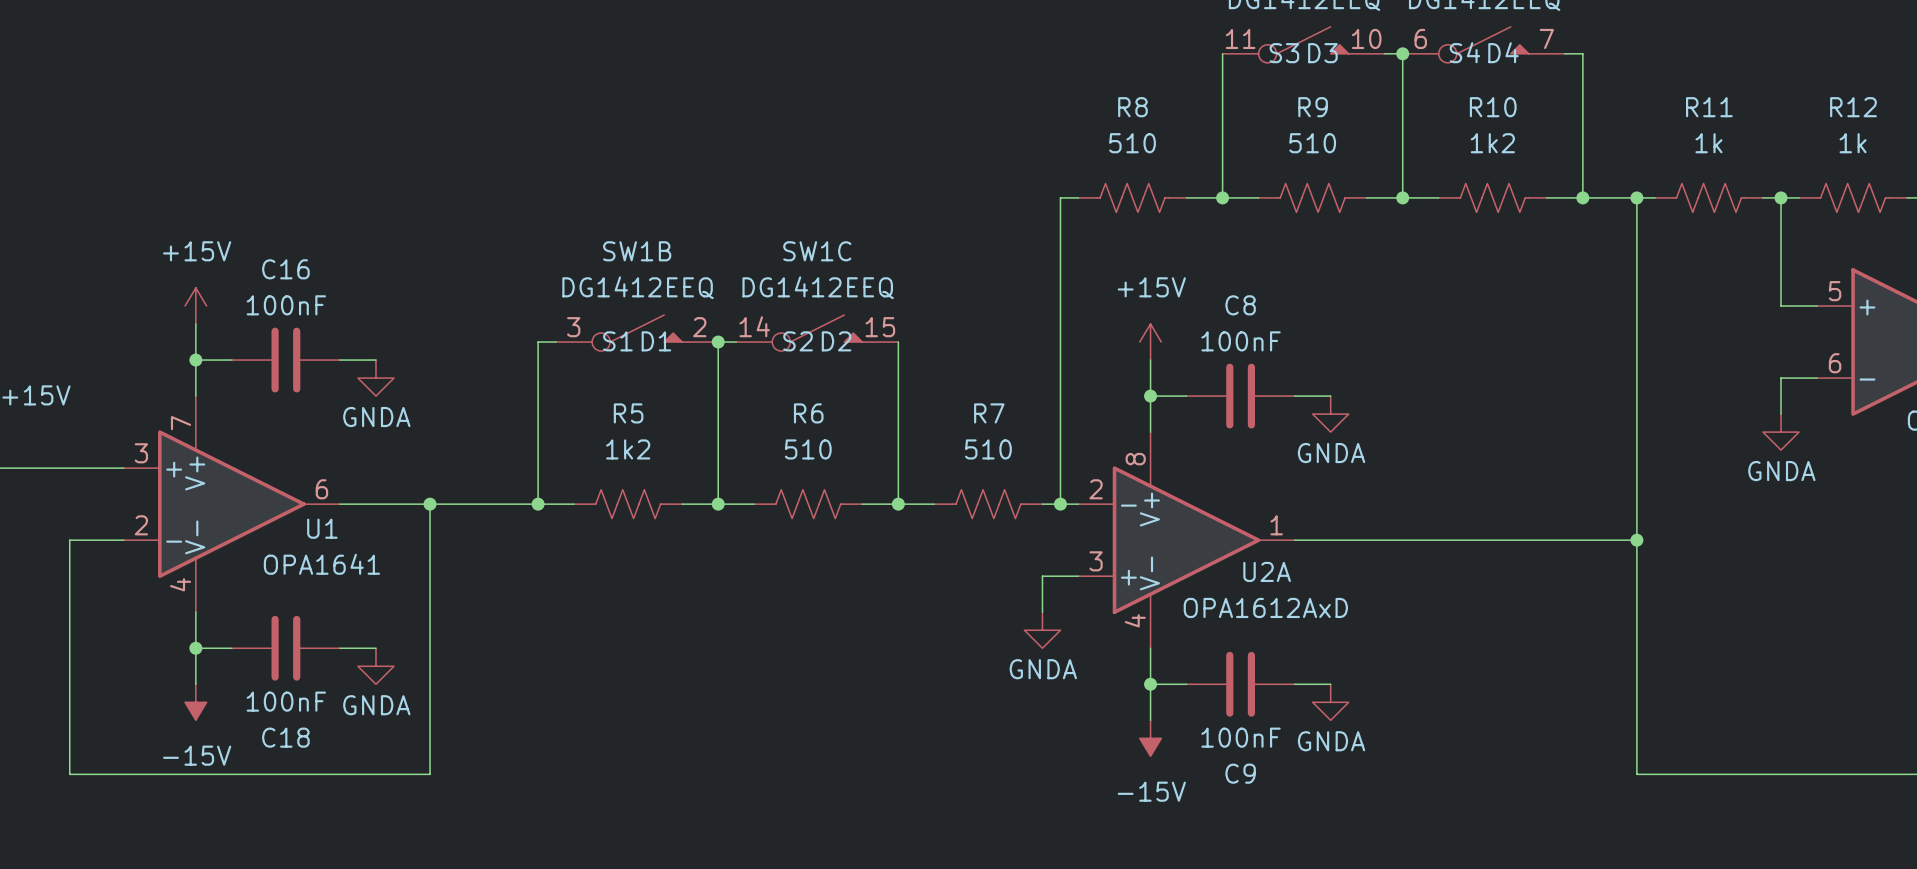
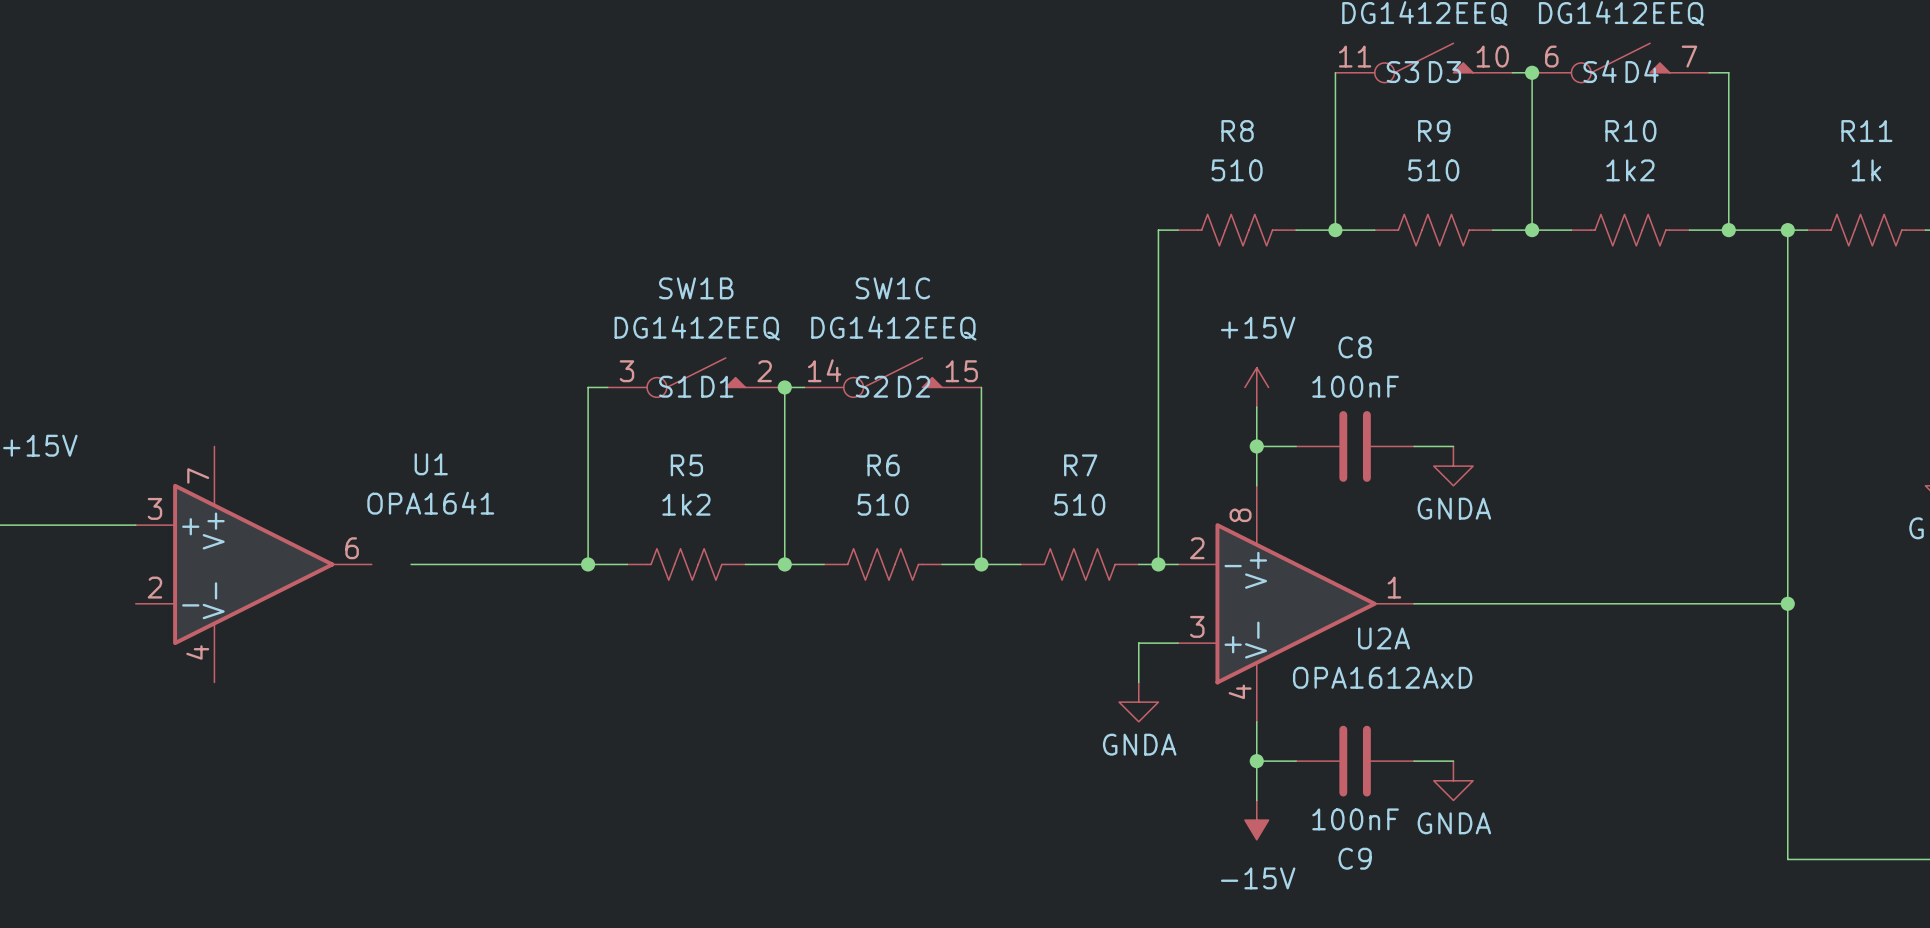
power symbol: +15V (195, 306) -> none
wire: (195, 324) (195, 396) -> none
wire: (195, 360) (231, 360) -> none
junction: (195, 360) -> none
C16: 100nF (285, 360) -> none
wire: (339, 360) (375, 360) -> none
power symbol: GNDA (375, 378) -> none
wire: (339, 504) (375, 504) -> none
wire: (430, 504) (430, 774) (69, 774) (69, 540) (123, 540) -> none
junction: (430, 504) -> none
U1 name position: U1 (322, 528) -> U1 (431, 464)
U1 value position: OPA1641 (321, 564) -> OPA1641 (430, 503)
wire: (195, 612) (195, 684) -> none
wire: (195, 648) (231, 648) -> none
junction: (195, 648) -> none
C18: 100nF (285, 648) -> none
wire: (339, 648) (375, 648) -> none
power symbol: GNDA (375, 666) -> none
power symbol: -15V (195, 702) -> none

